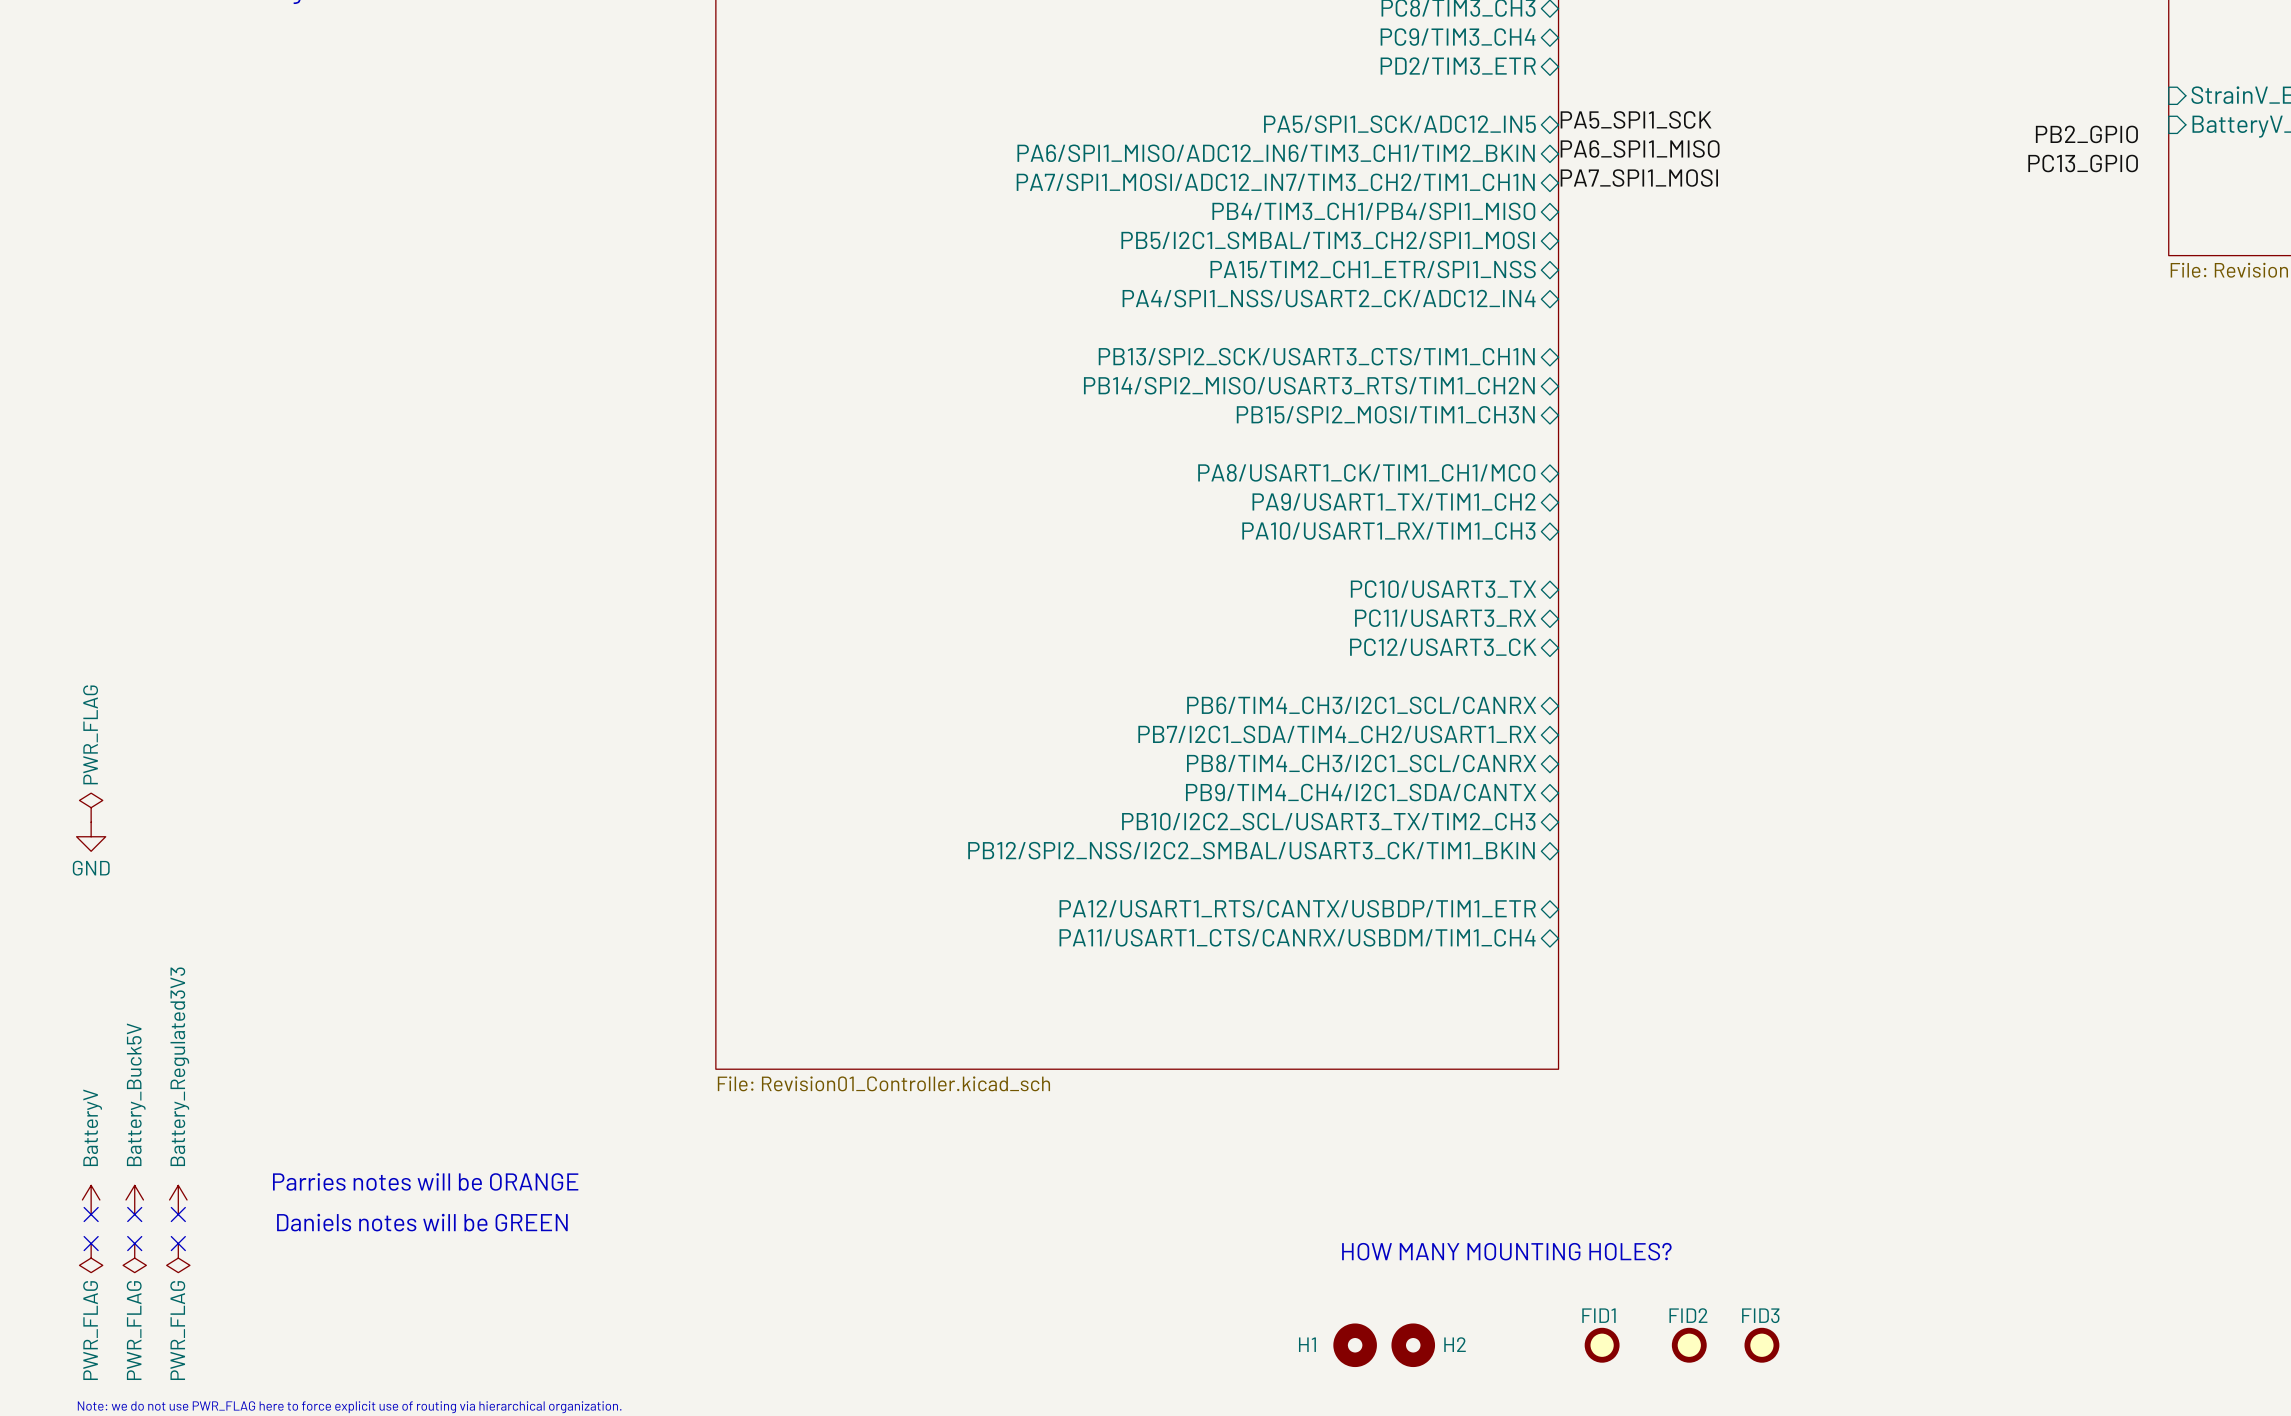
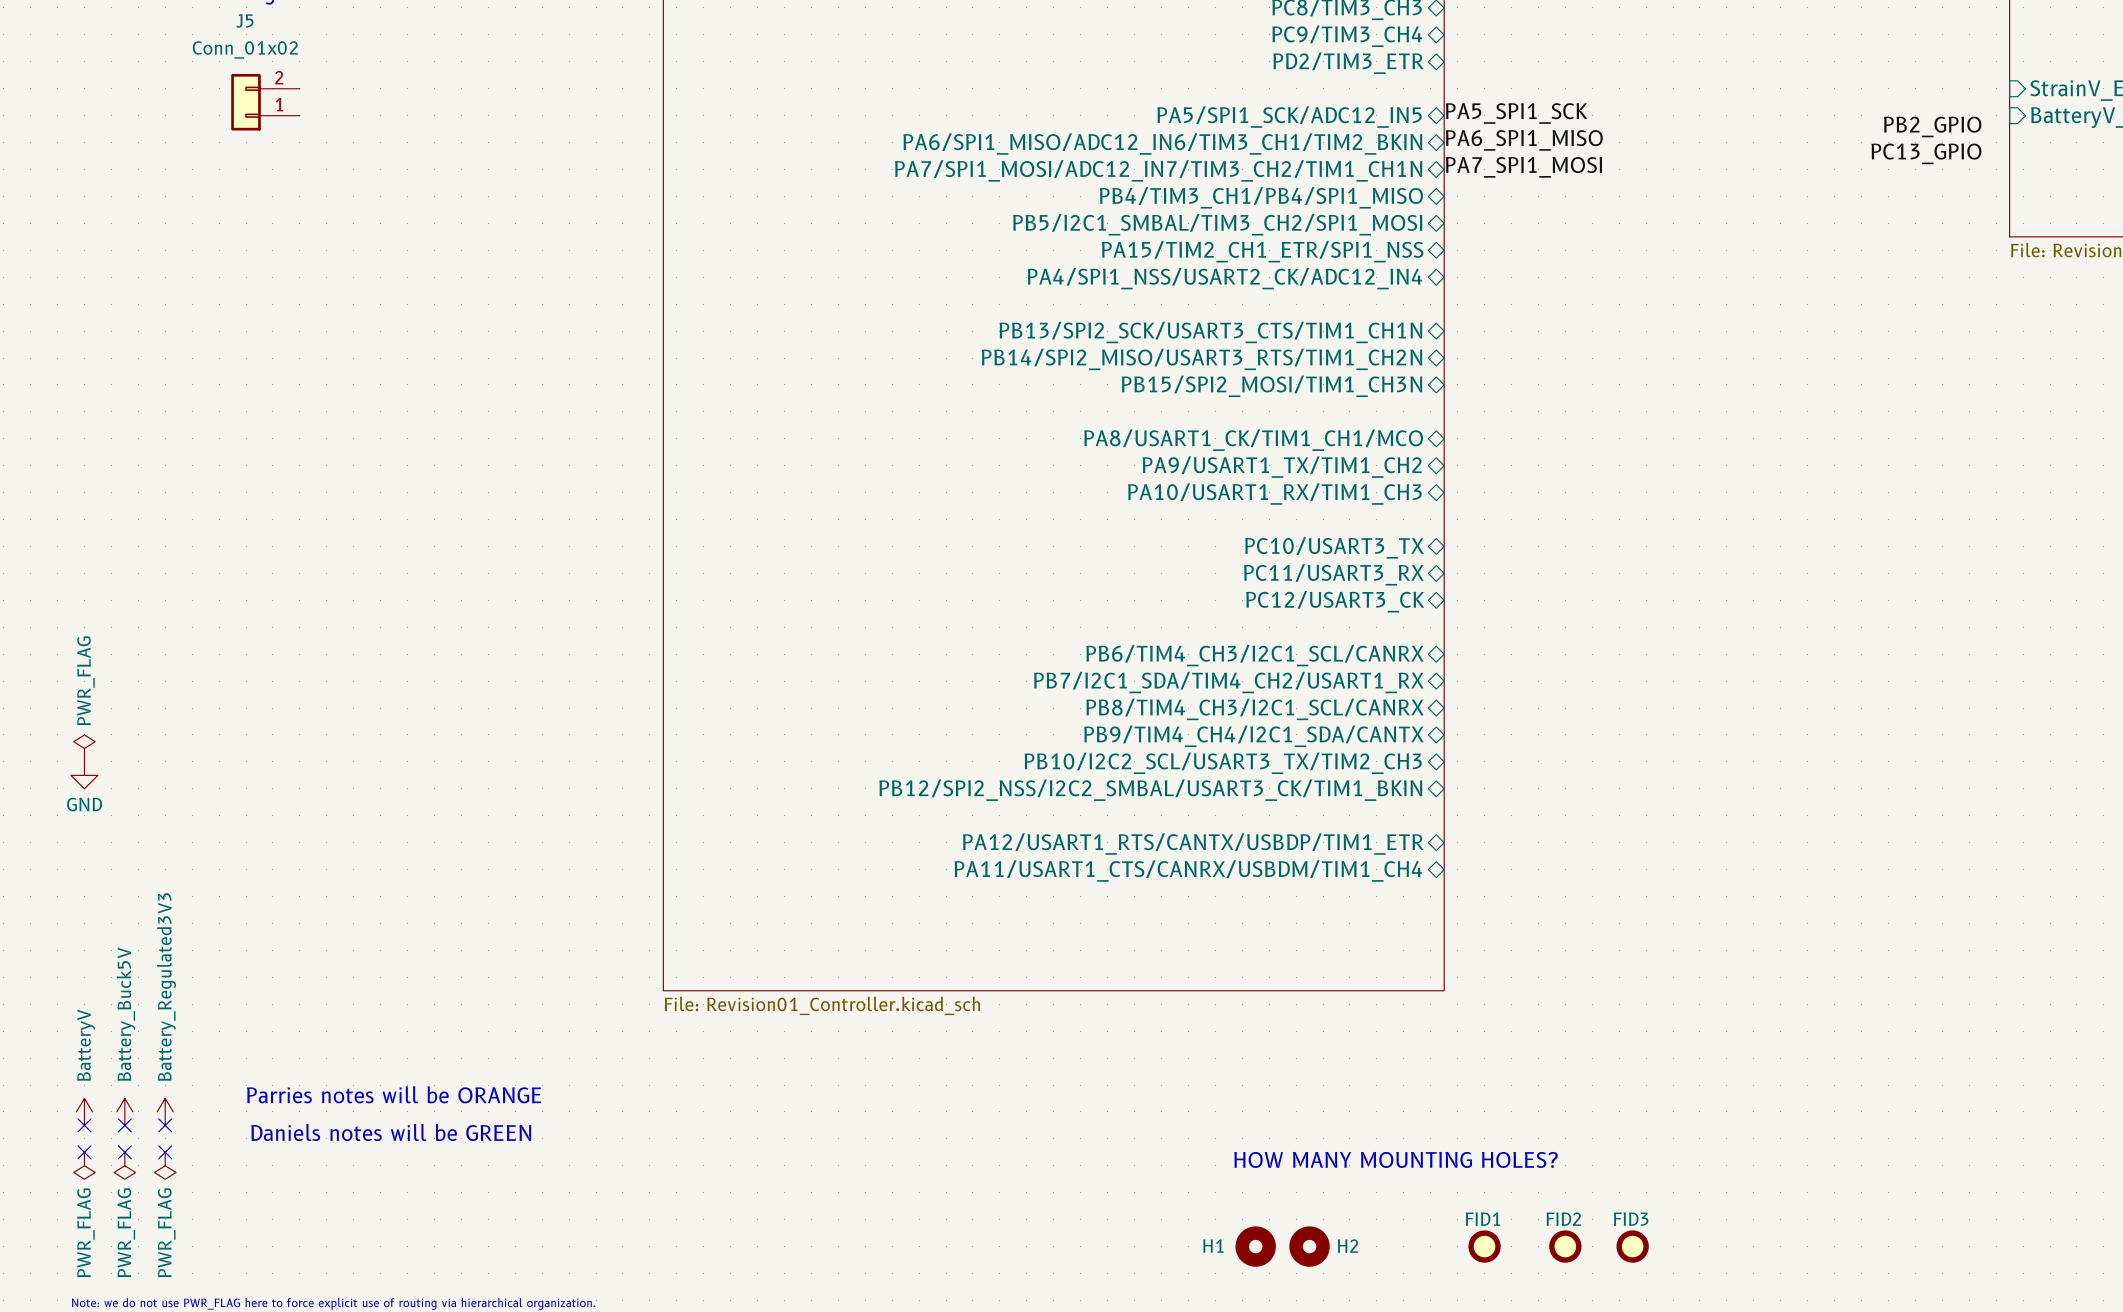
J5: none -> Conn_01x02 (265, 102)

